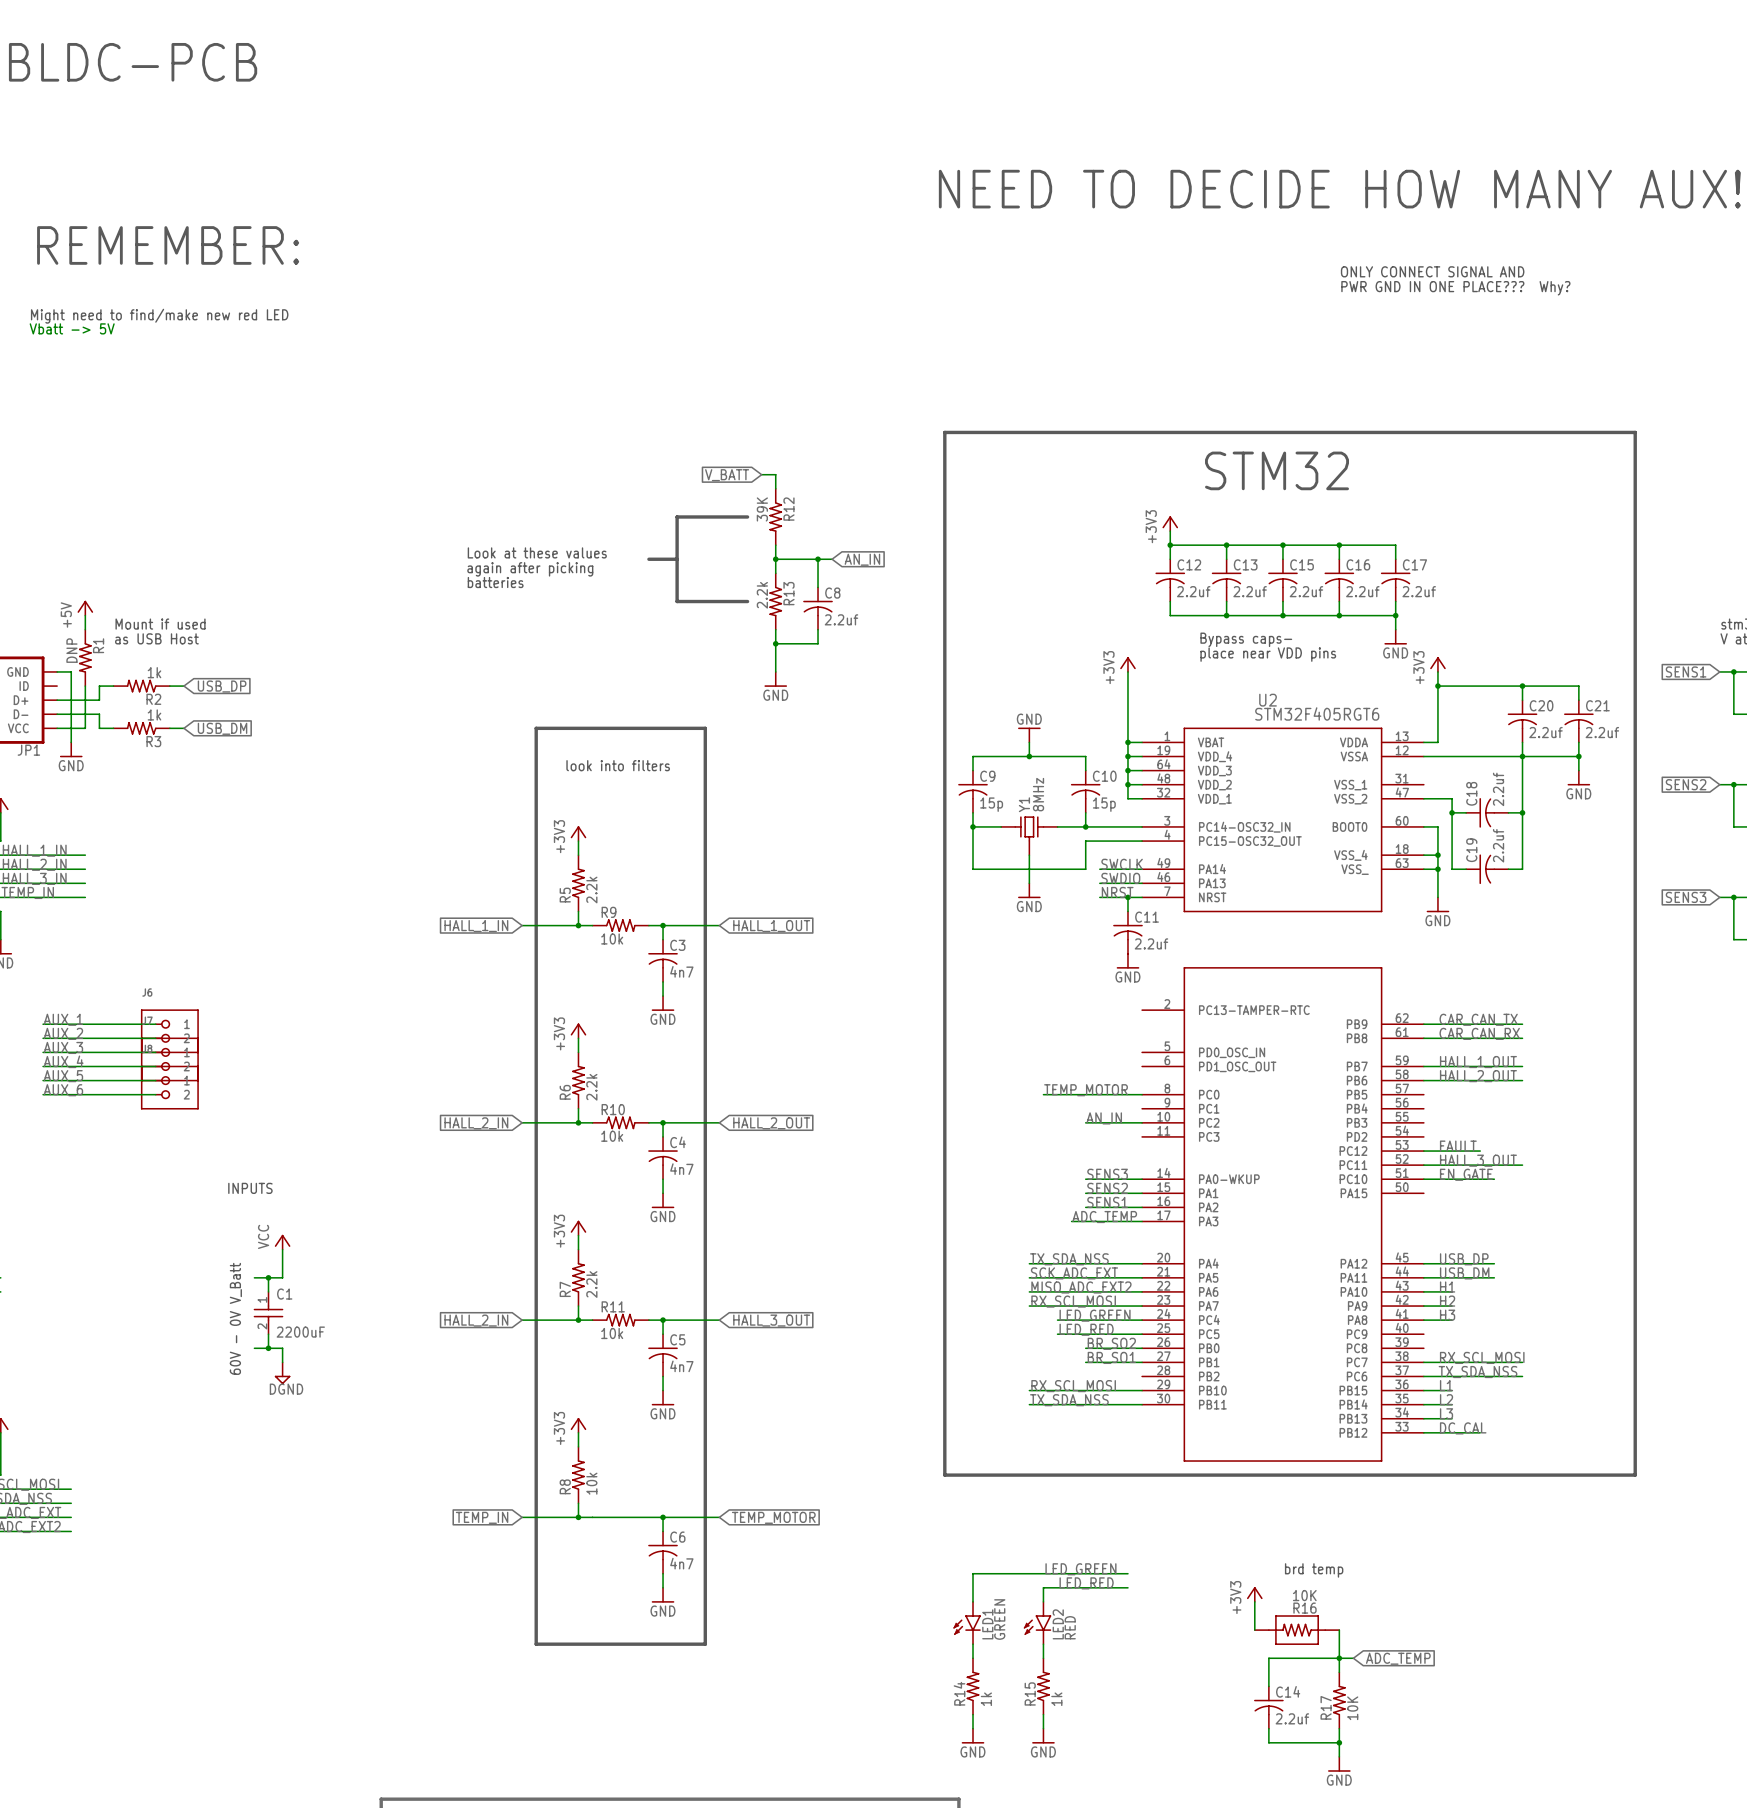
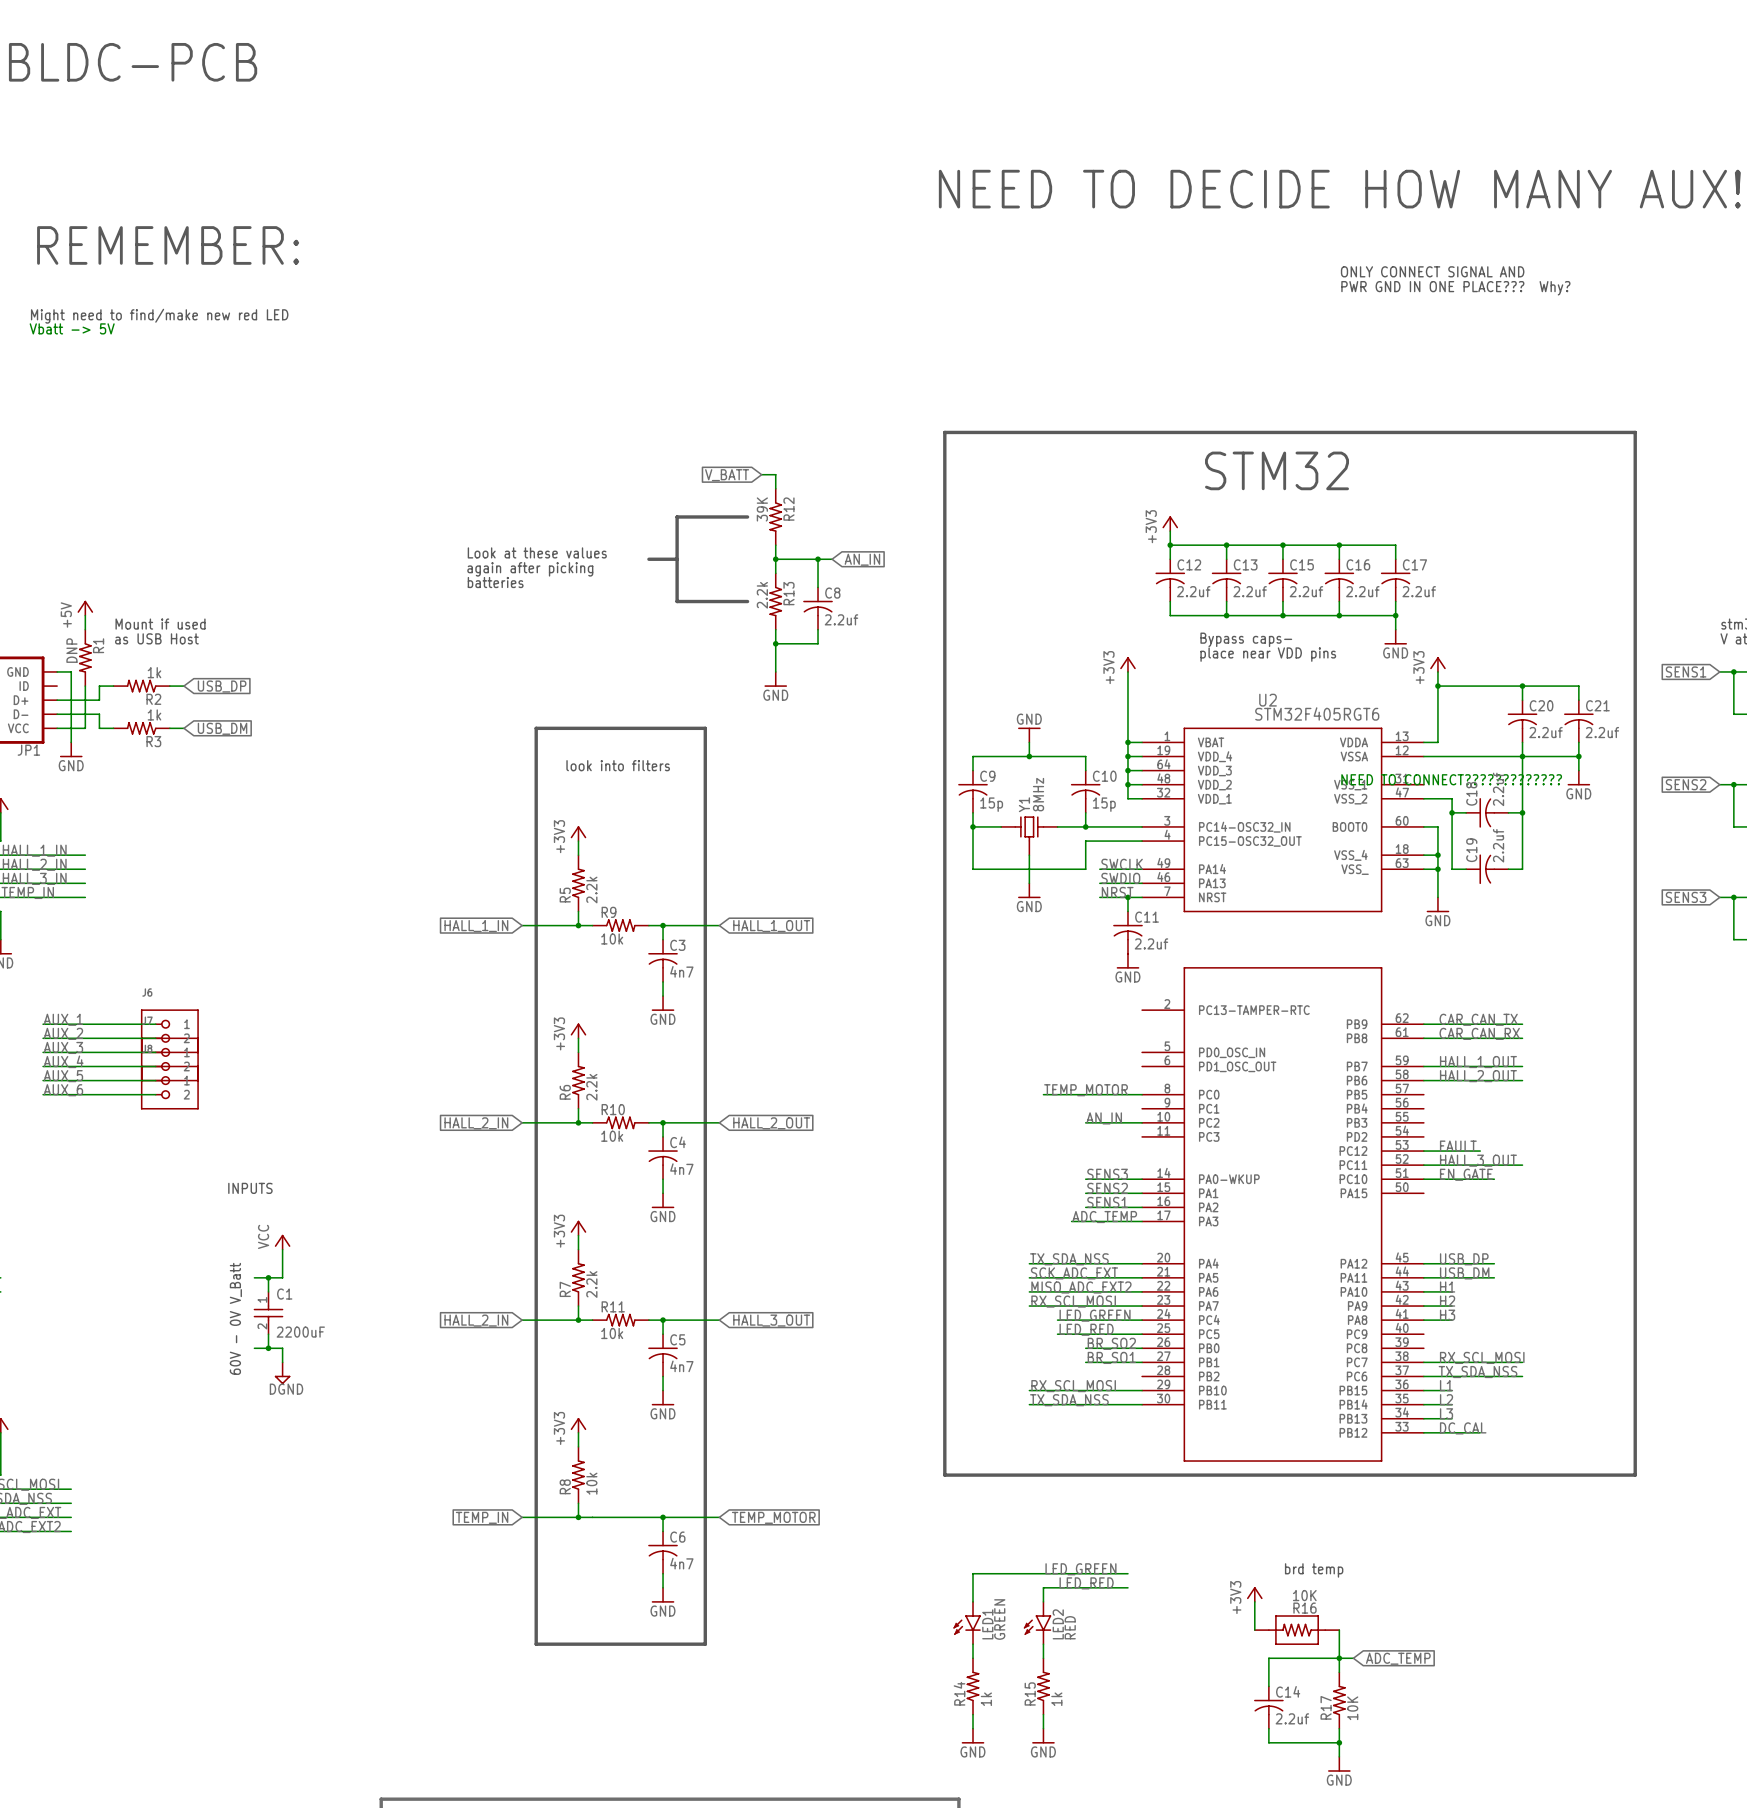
text: none -> NEED TO CONNECT????????????? (1451, 779)

